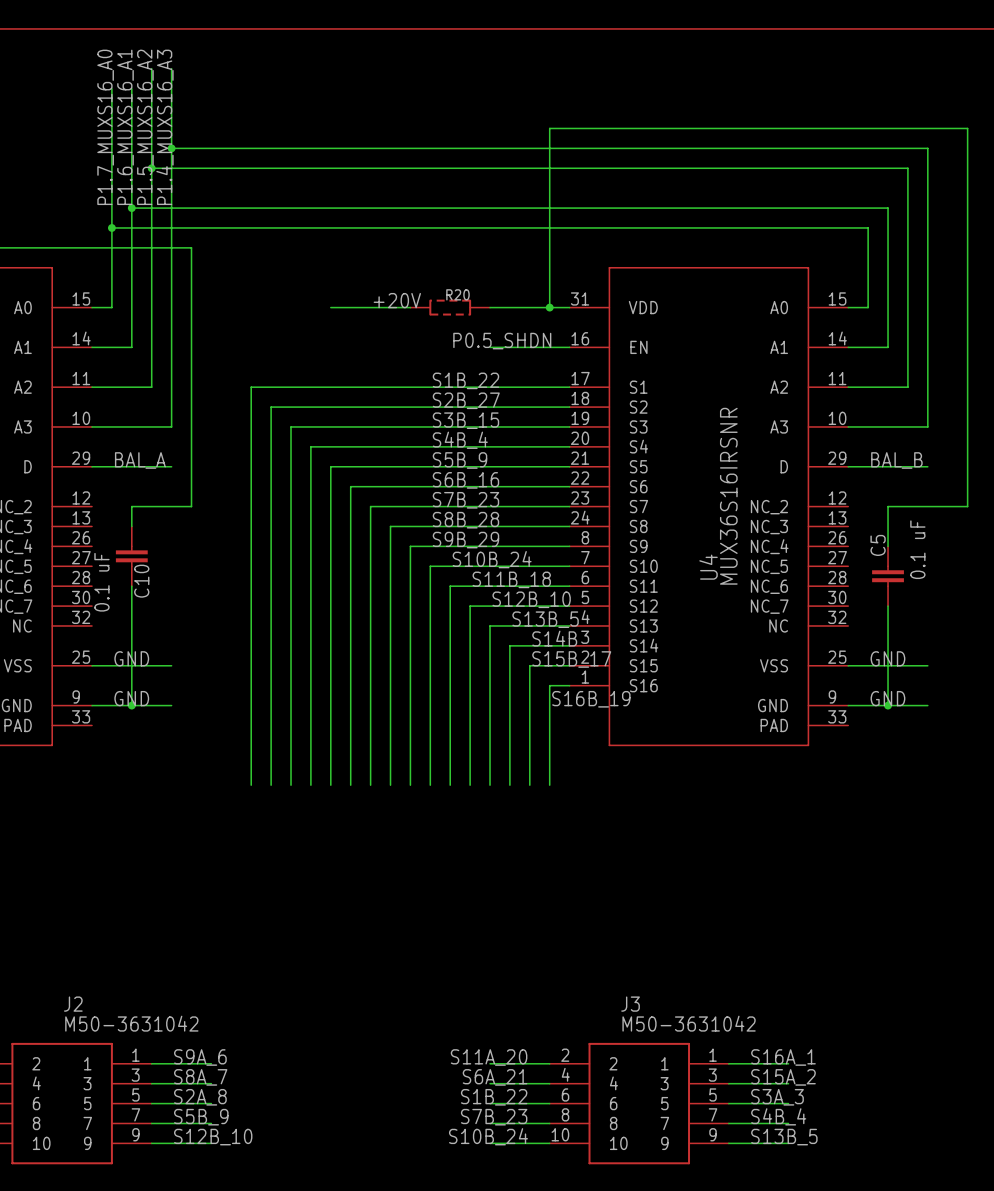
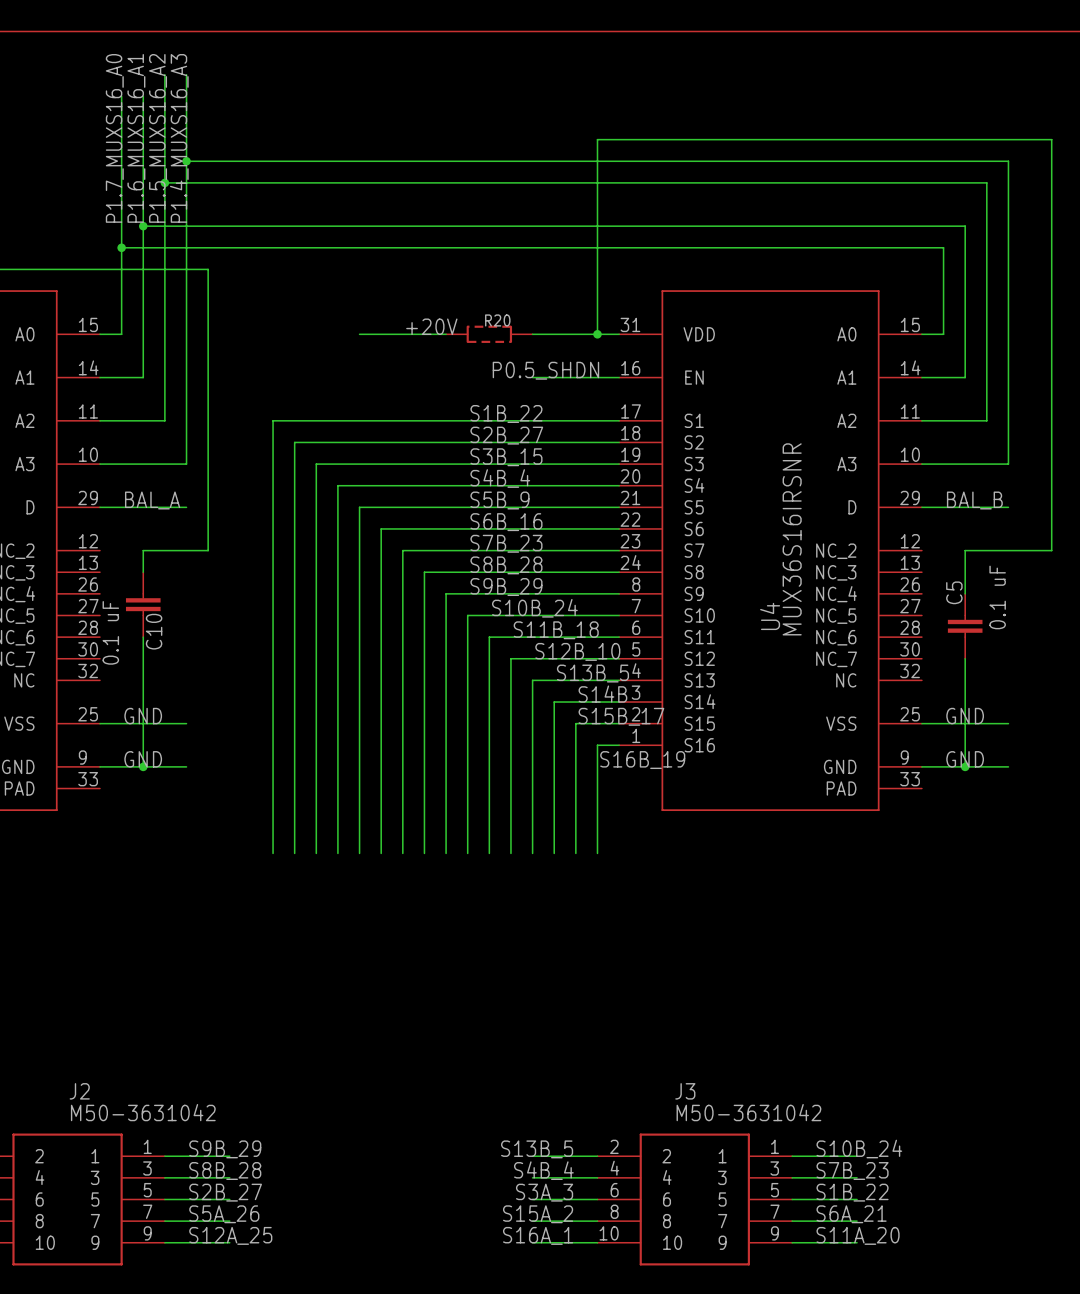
label: S9A_6 (200, 1057) -> S9B_29 (225, 1149)
label: S11A_20 (489, 1057) -> S13B_5 (537, 1149)
label: S16A_1 (783, 1057) -> S10B_24 (859, 1149)
label: S8A_7 (200, 1077) -> S8B_28 (225, 1171)
label: S6A_21 (495, 1077) -> S4B_4 (543, 1170)
label: S15A_2 (783, 1077) -> S7B_23 (852, 1171)
label: S2A_8 (200, 1097) -> S2B_27 (225, 1192)
label: S1B_22 (494, 1097) -> S3A_3 (544, 1192)
label: S3A_3 (777, 1097) -> S1B_22 (852, 1192)
label: S4B_4 (778, 1116) -> S6A_21 (851, 1214)
label: S5B_9 (201, 1117) -> S5A_26 (224, 1214)
label: S7B_23 (494, 1117) -> S15A_2 (538, 1214)
label: S10B_24 (488, 1136) -> S16A_1 (538, 1235)
label: S12B_10 (213, 1137) -> S12A_25 (230, 1235)
label: S13B_5 (784, 1137) -> S11A_20 (858, 1235)

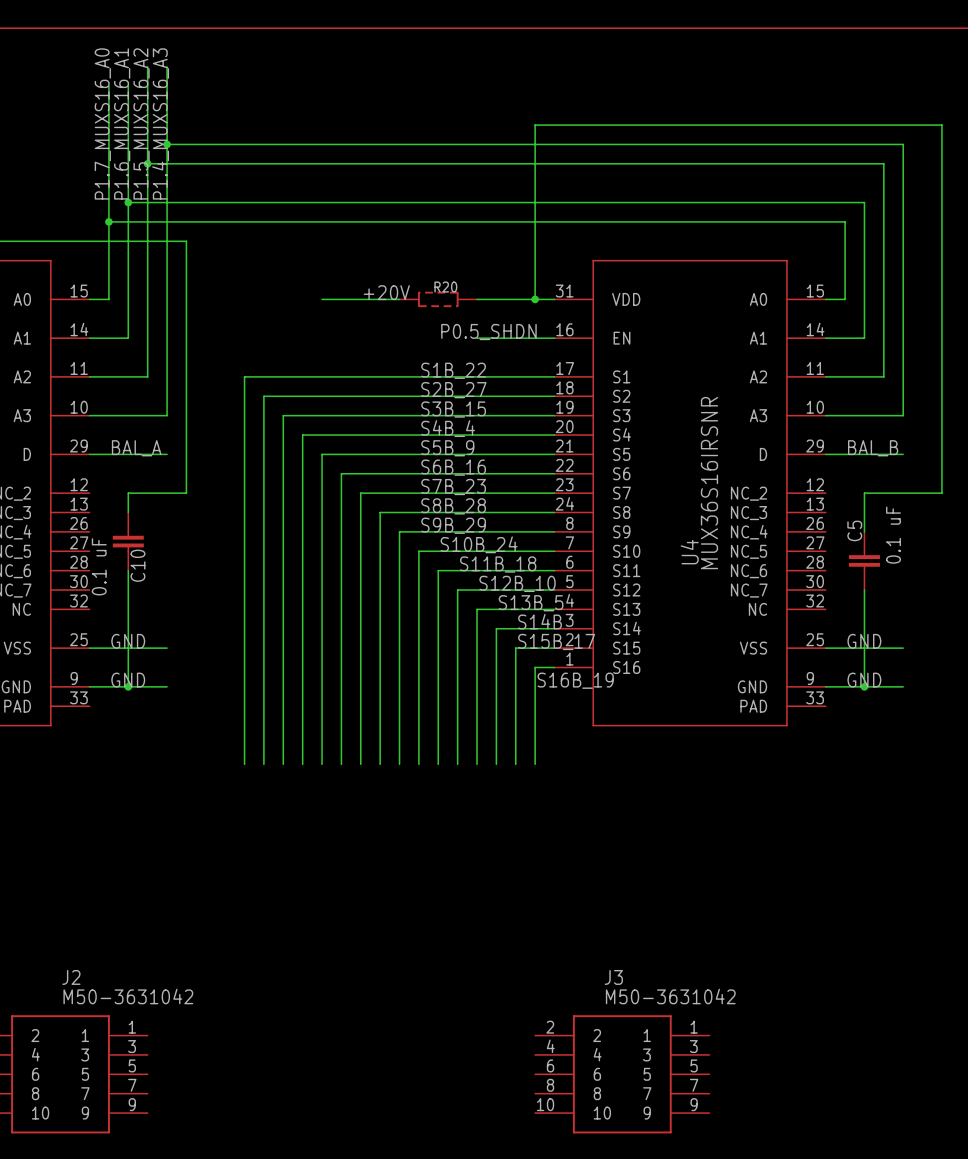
label: S9B_29 (225, 1149) -> none
label: S13B_5 (537, 1149) -> none
label: S10B_24 (859, 1149) -> none
wire: (164, 1156) (229, 1156) -> none
wire: (532, 1156) (597, 1156) -> none
wire: (792, 1156) (857, 1156) -> none
label: S4B_4 (543, 1170) -> none
label: S8B_28 (225, 1171) -> none
label: S7B_23 (852, 1171) -> none
wire: (164, 1177) (229, 1177) -> none
wire: (532, 1177) (597, 1177) -> none
wire: (792, 1177) (857, 1177) -> none
label: S2B_27 (225, 1192) -> none
label: S3A_3 (544, 1192) -> none
label: S1B_22 (852, 1192) -> none
wire: (164, 1199) (229, 1199) -> none
wire: (532, 1199) (597, 1199) -> none
wire: (792, 1199) (857, 1199) -> none
label: S5A_26 (224, 1214) -> none
label: S15A_2 (538, 1214) -> none
label: S6A_21 (851, 1214) -> none
wire: (164, 1221) (229, 1221) -> none
wire: (532, 1221) (597, 1221) -> none
wire: (792, 1221) (857, 1221) -> none
label: S12A_25 (230, 1235) -> none
label: S16A_1 (538, 1235) -> none
label: S11A_20 (858, 1235) -> none
wire: (164, 1242) (229, 1242) -> none
wire: (532, 1242) (597, 1242) -> none
wire: (792, 1242) (857, 1242) -> none

